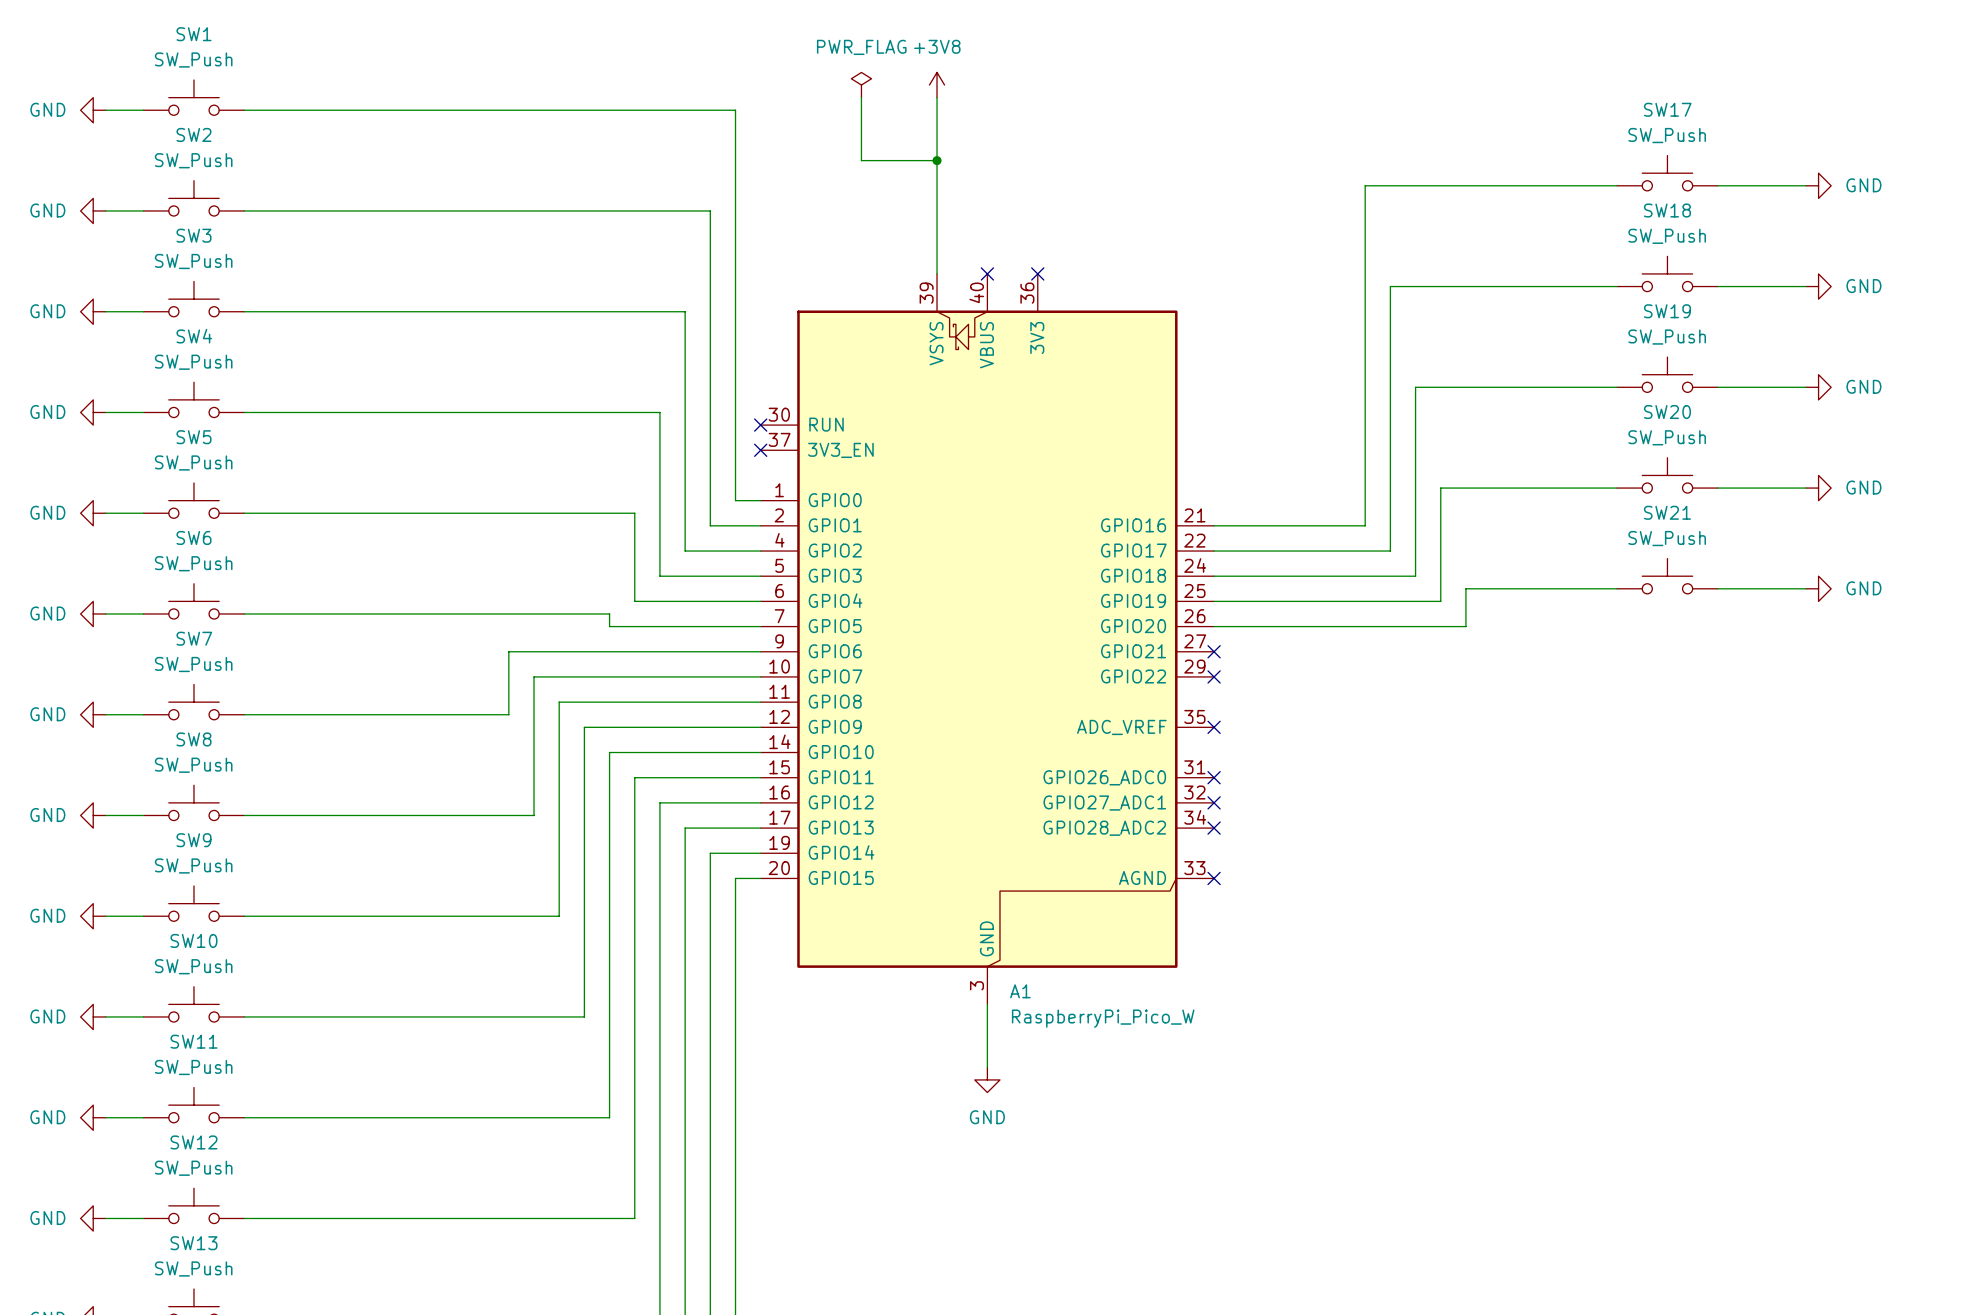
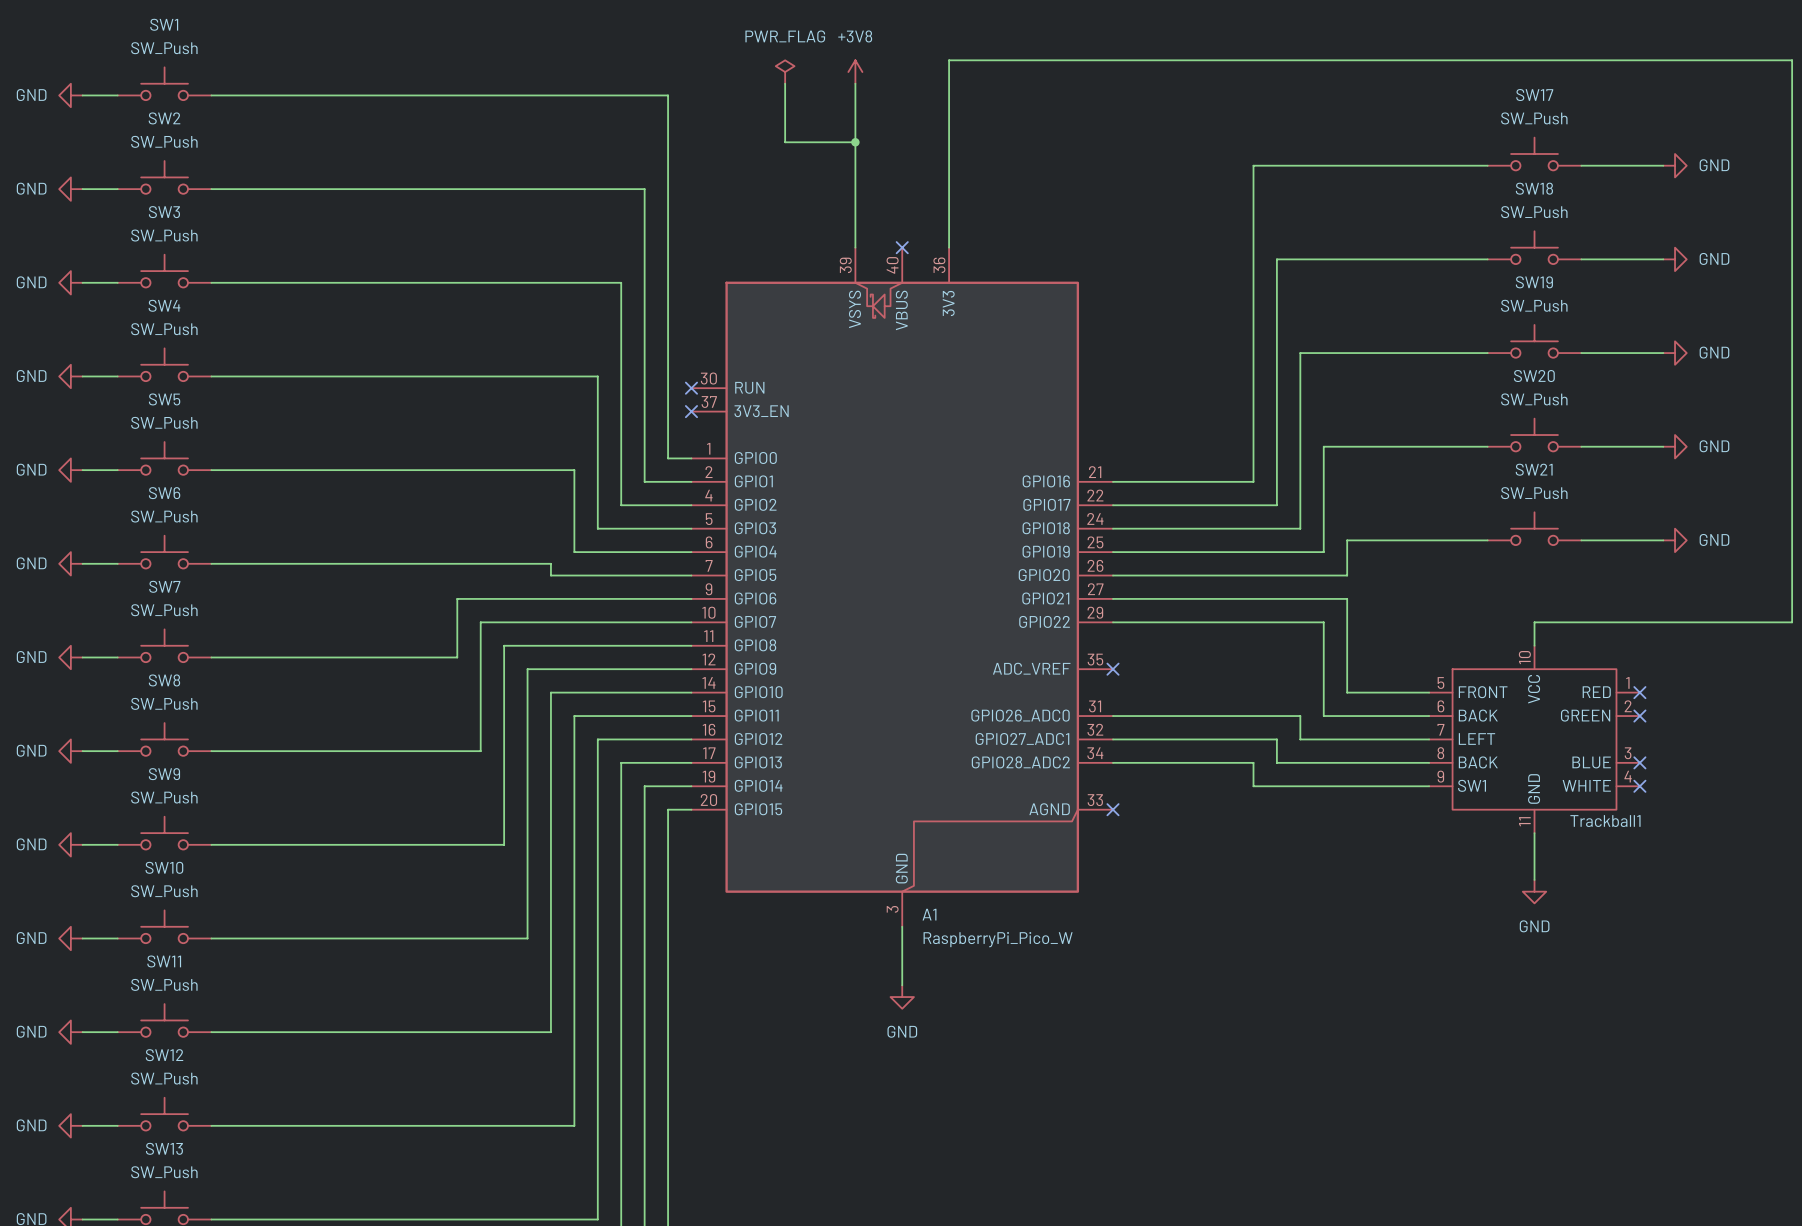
wire: none -> (949, 247) (949, 60) (1792, 60) (1792, 622) (1534, 622) (1534, 645)
no-connect mark: (1037, 273) -> none
wire: none -> (1112, 598) (1347, 598) (1347, 692) (1429, 692)
no-connect mark: (1214, 651) -> none
wire: none -> (1112, 622) (1323, 622) (1323, 716) (1429, 716)
no-connect mark: (1214, 676) -> none
no-connect mark: none -> (1639, 692)
wire: none -> (1112, 716) (1300, 716) (1300, 739) (1429, 739)
no-connect mark: (1214, 777) -> none
no-connect mark: none -> (1639, 716)
wire: none -> (1112, 739) (1276, 739) (1276, 762) (1429, 762)
no-connect mark: (1214, 802) -> none
Trackball1: none -> (1534, 739)
wire: none -> (1112, 762) (1253, 762) (1253, 786) (1429, 786)
no-connect mark: (1214, 828) -> none
no-connect mark: none -> (1639, 762)
no-connect mark: none -> (1639, 786)
wire: none -> (1534, 833) (1534, 879)
power symbol: none -> GND (1534, 891)

